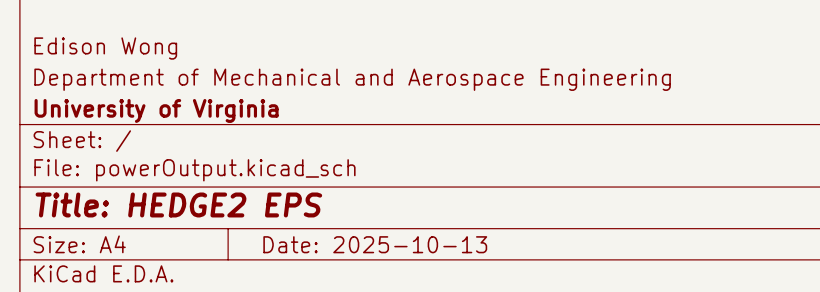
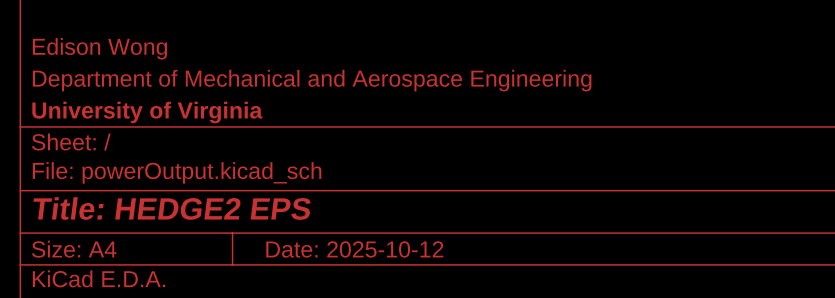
title block: Date: 2025-10-13 (375, 244) -> Date: 2025-10-12 (354, 249)

